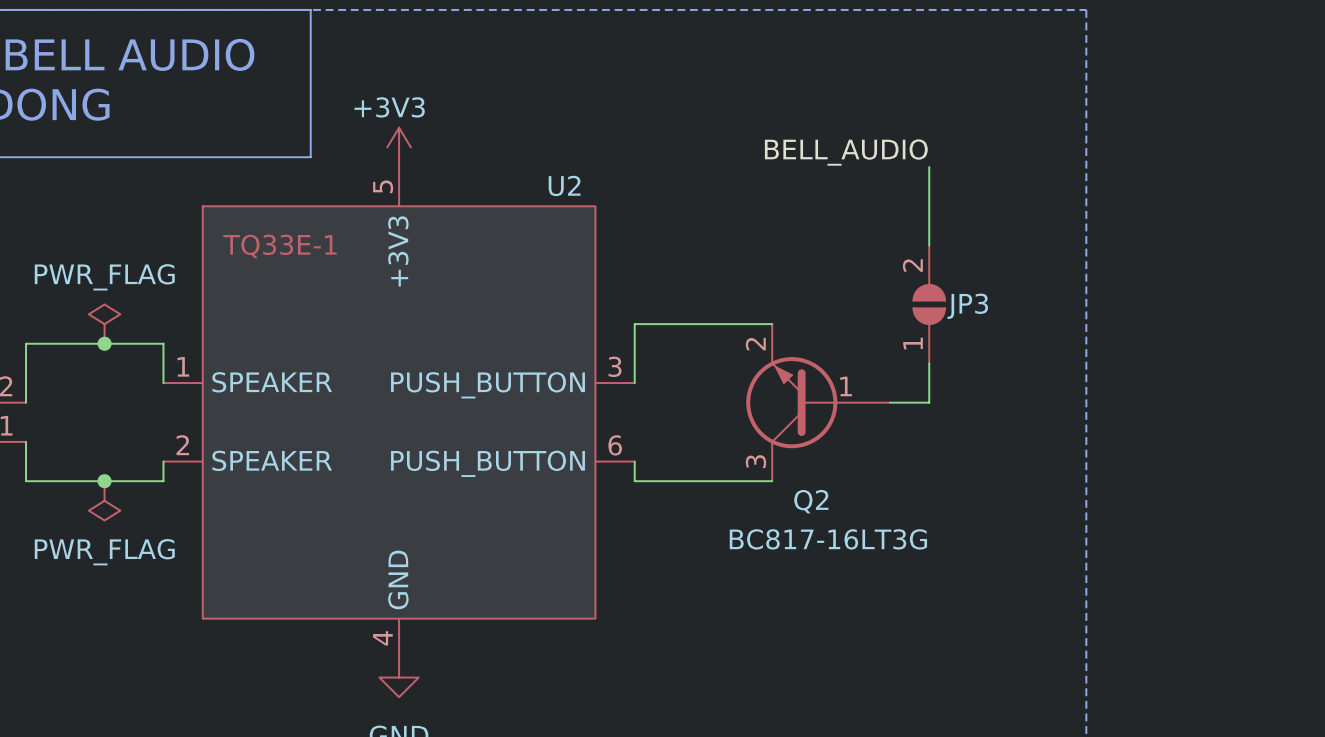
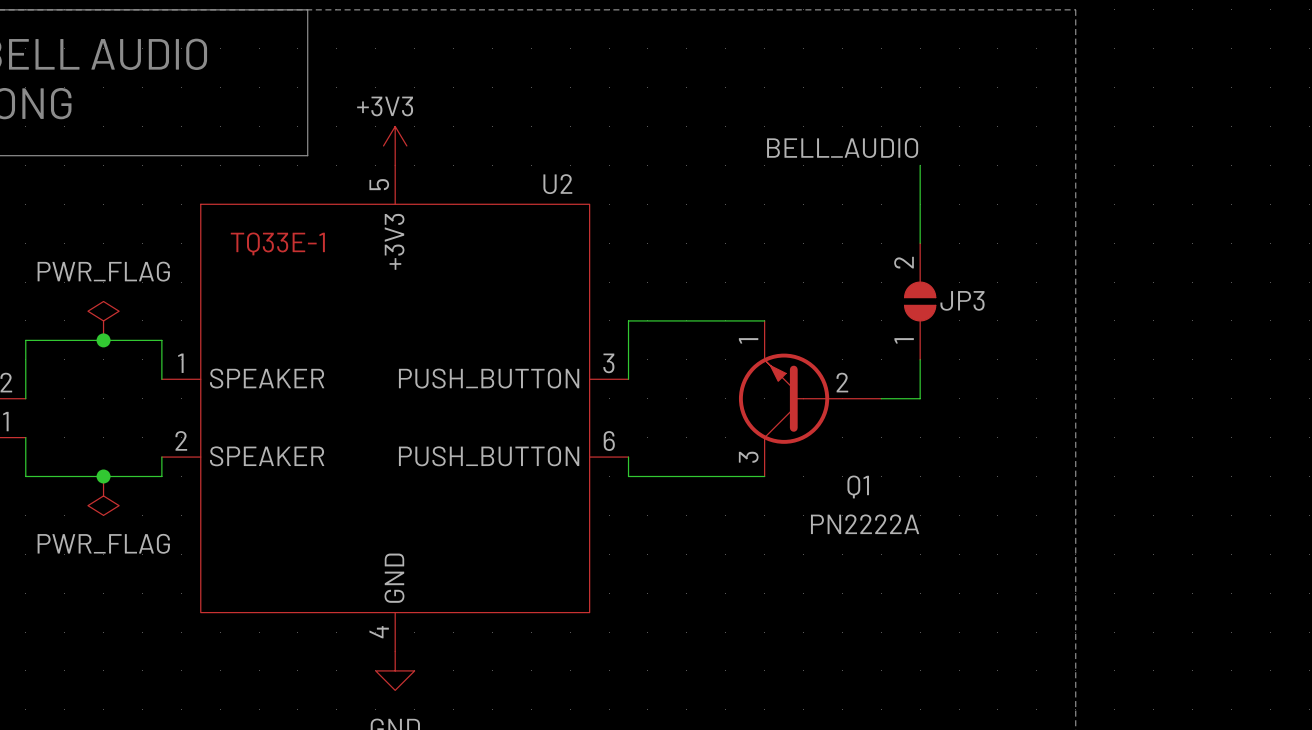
Q2: BC817-16LT3G (818, 402) -> none
Q1: none -> PN2222A (810, 398)

